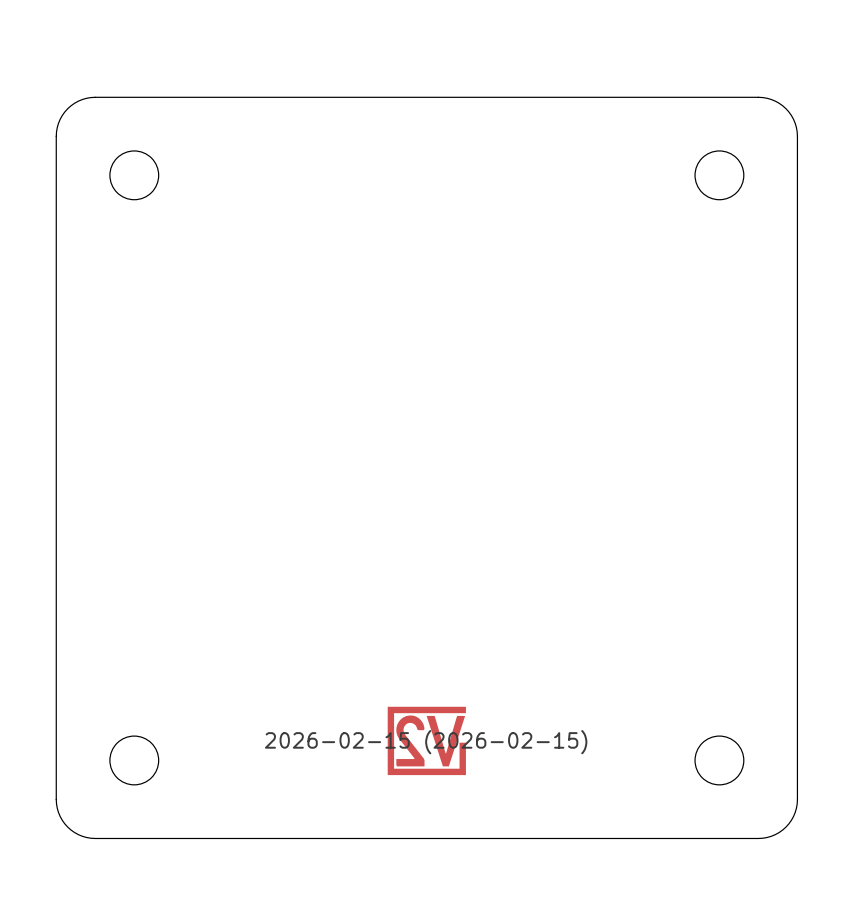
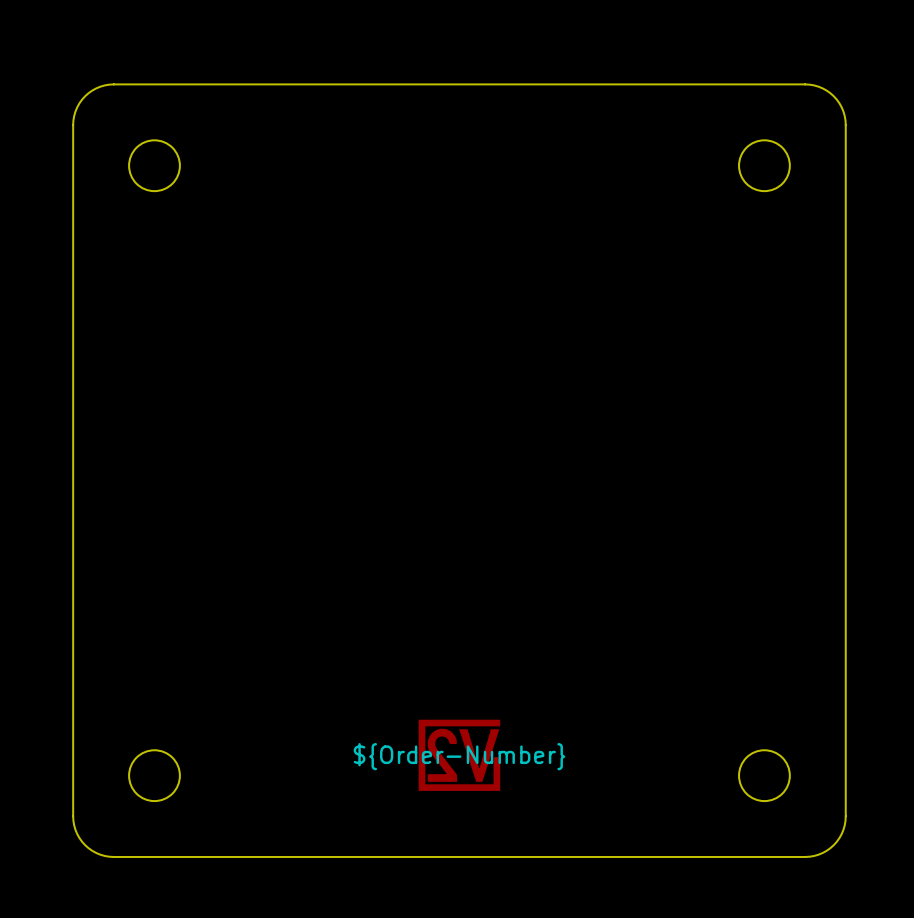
drawing shape: [264, 730, 588, 755] -> [353, 743, 566, 771]

